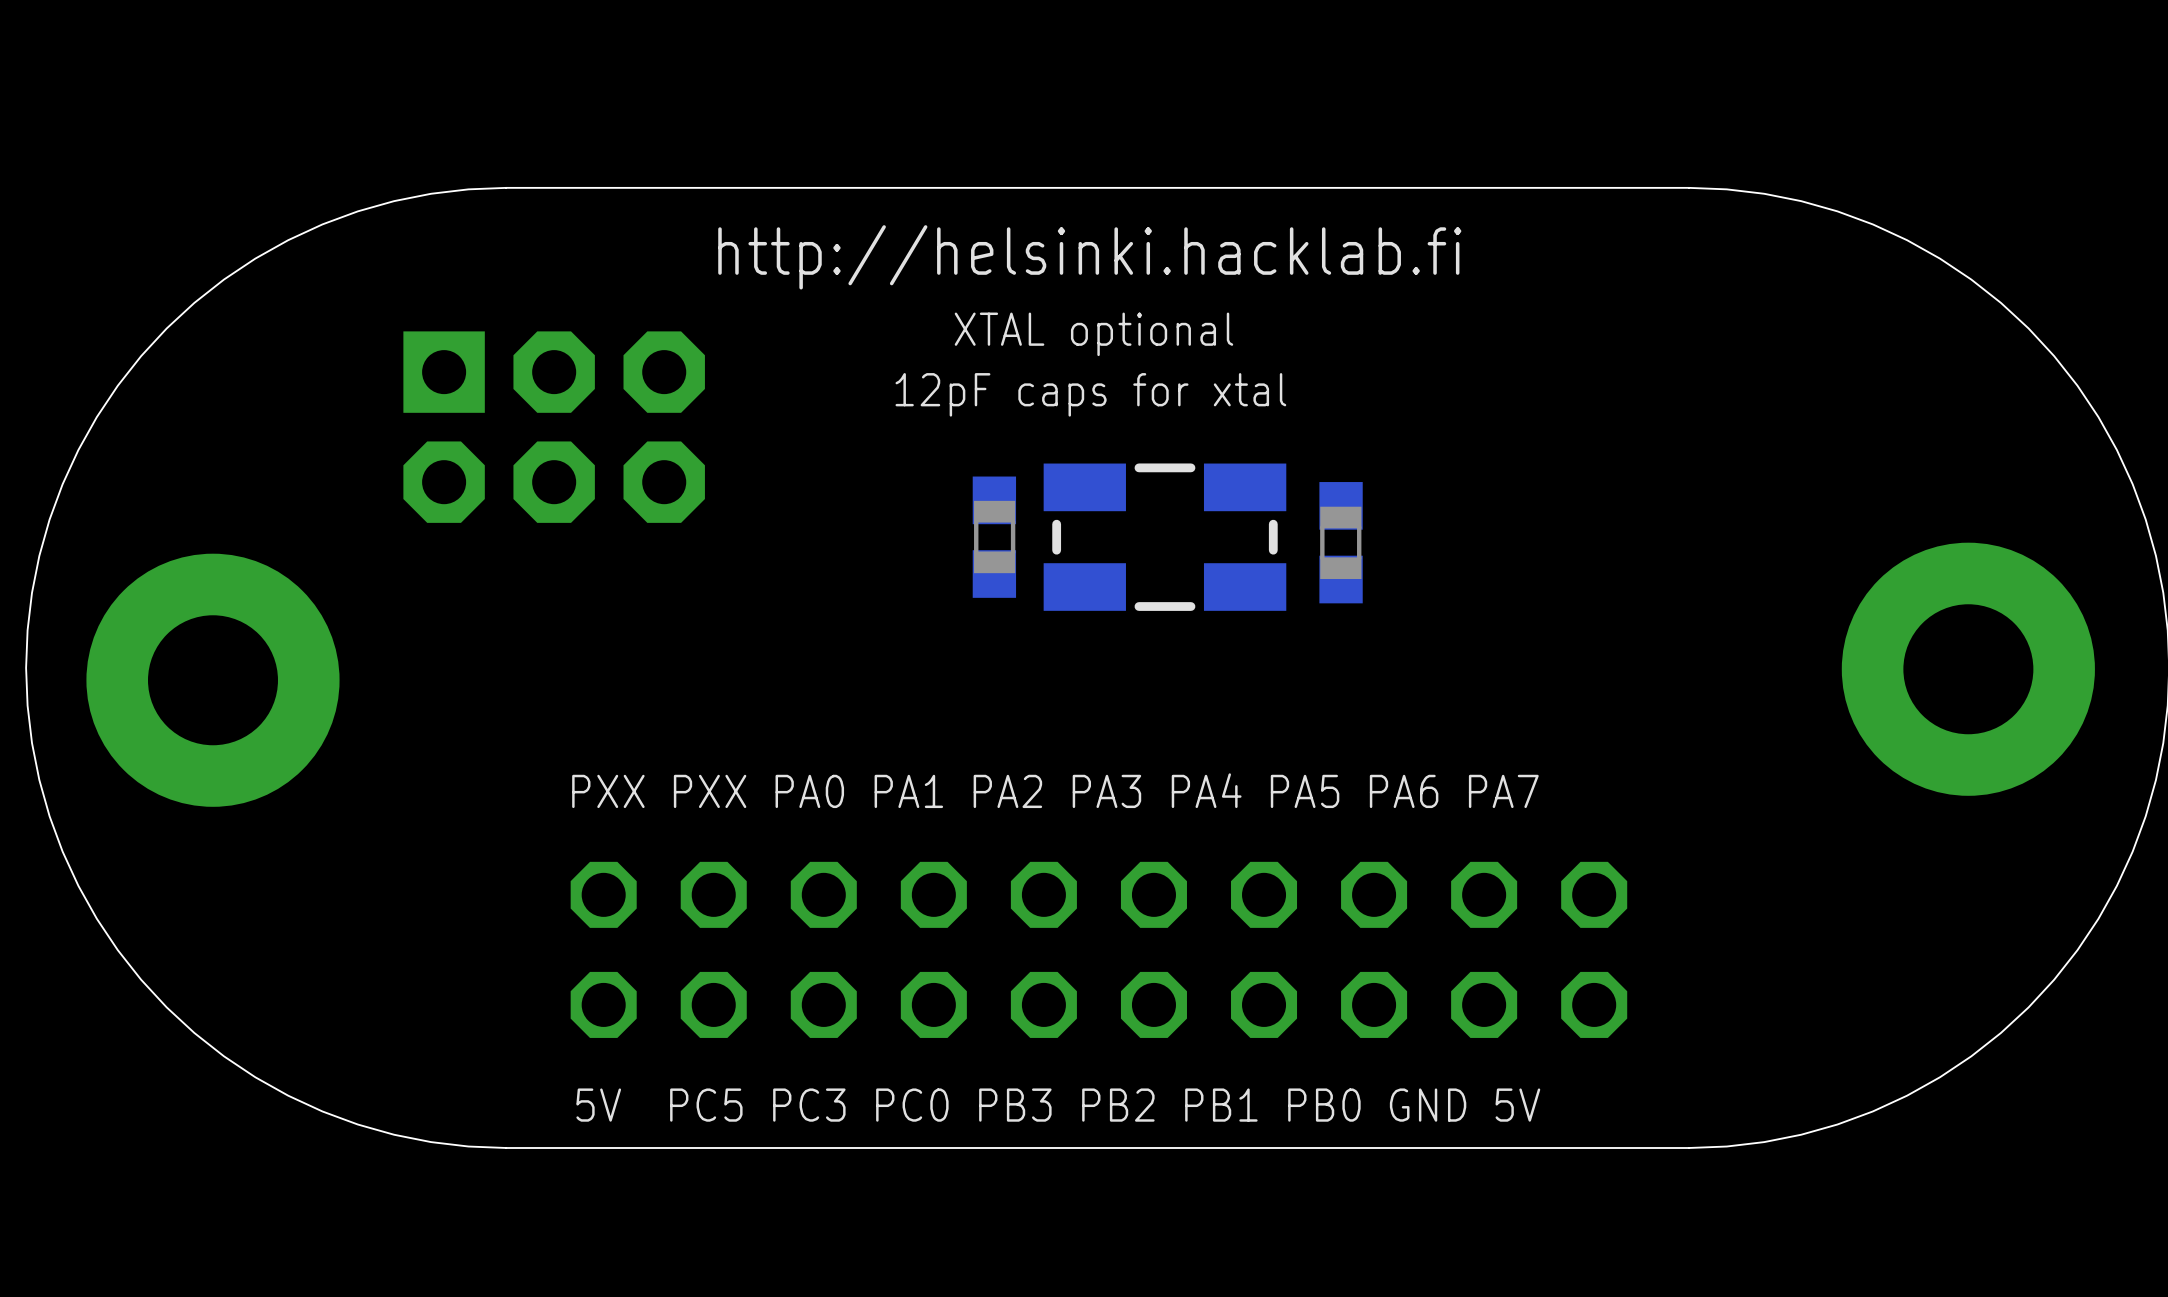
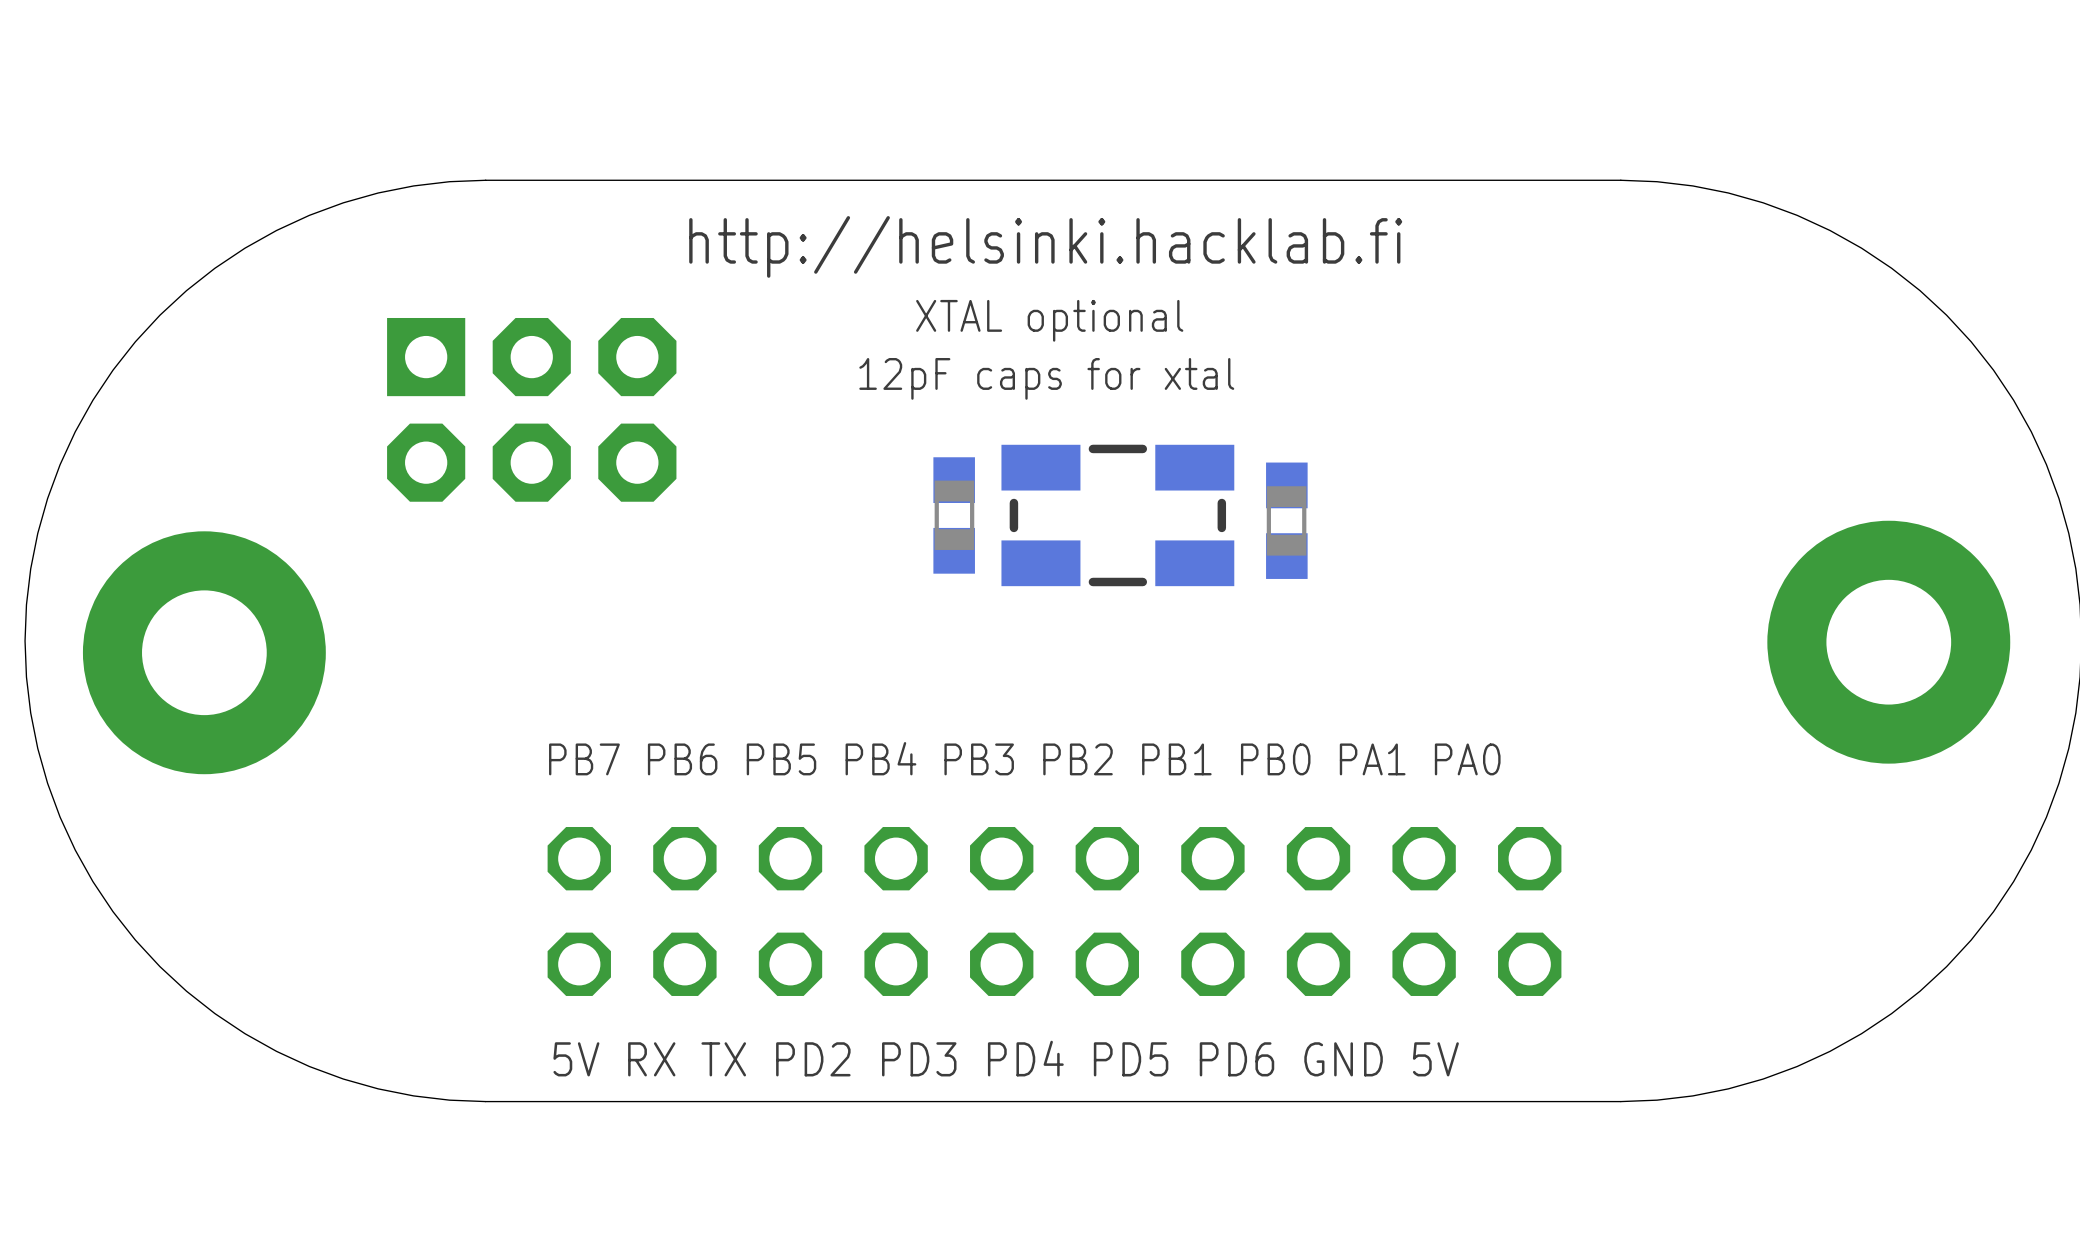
text: PXX PXX PA0 PA1 PA2 PA3 PA4 PA5 PA6 PA7 (1055, 790) -> PB7 PB6 PB5 PB4 PB3 PB2 PB1 PB0 PA1 PA0 (1024, 758)
text: 5V PC5 PC3 PC0 PB3 PB2 PB1 PB0 GND 5V (1058, 1105) -> 5V RX TX PD2 PD3 PD4 PD5 PD6 GND 5V (1006, 1058)

